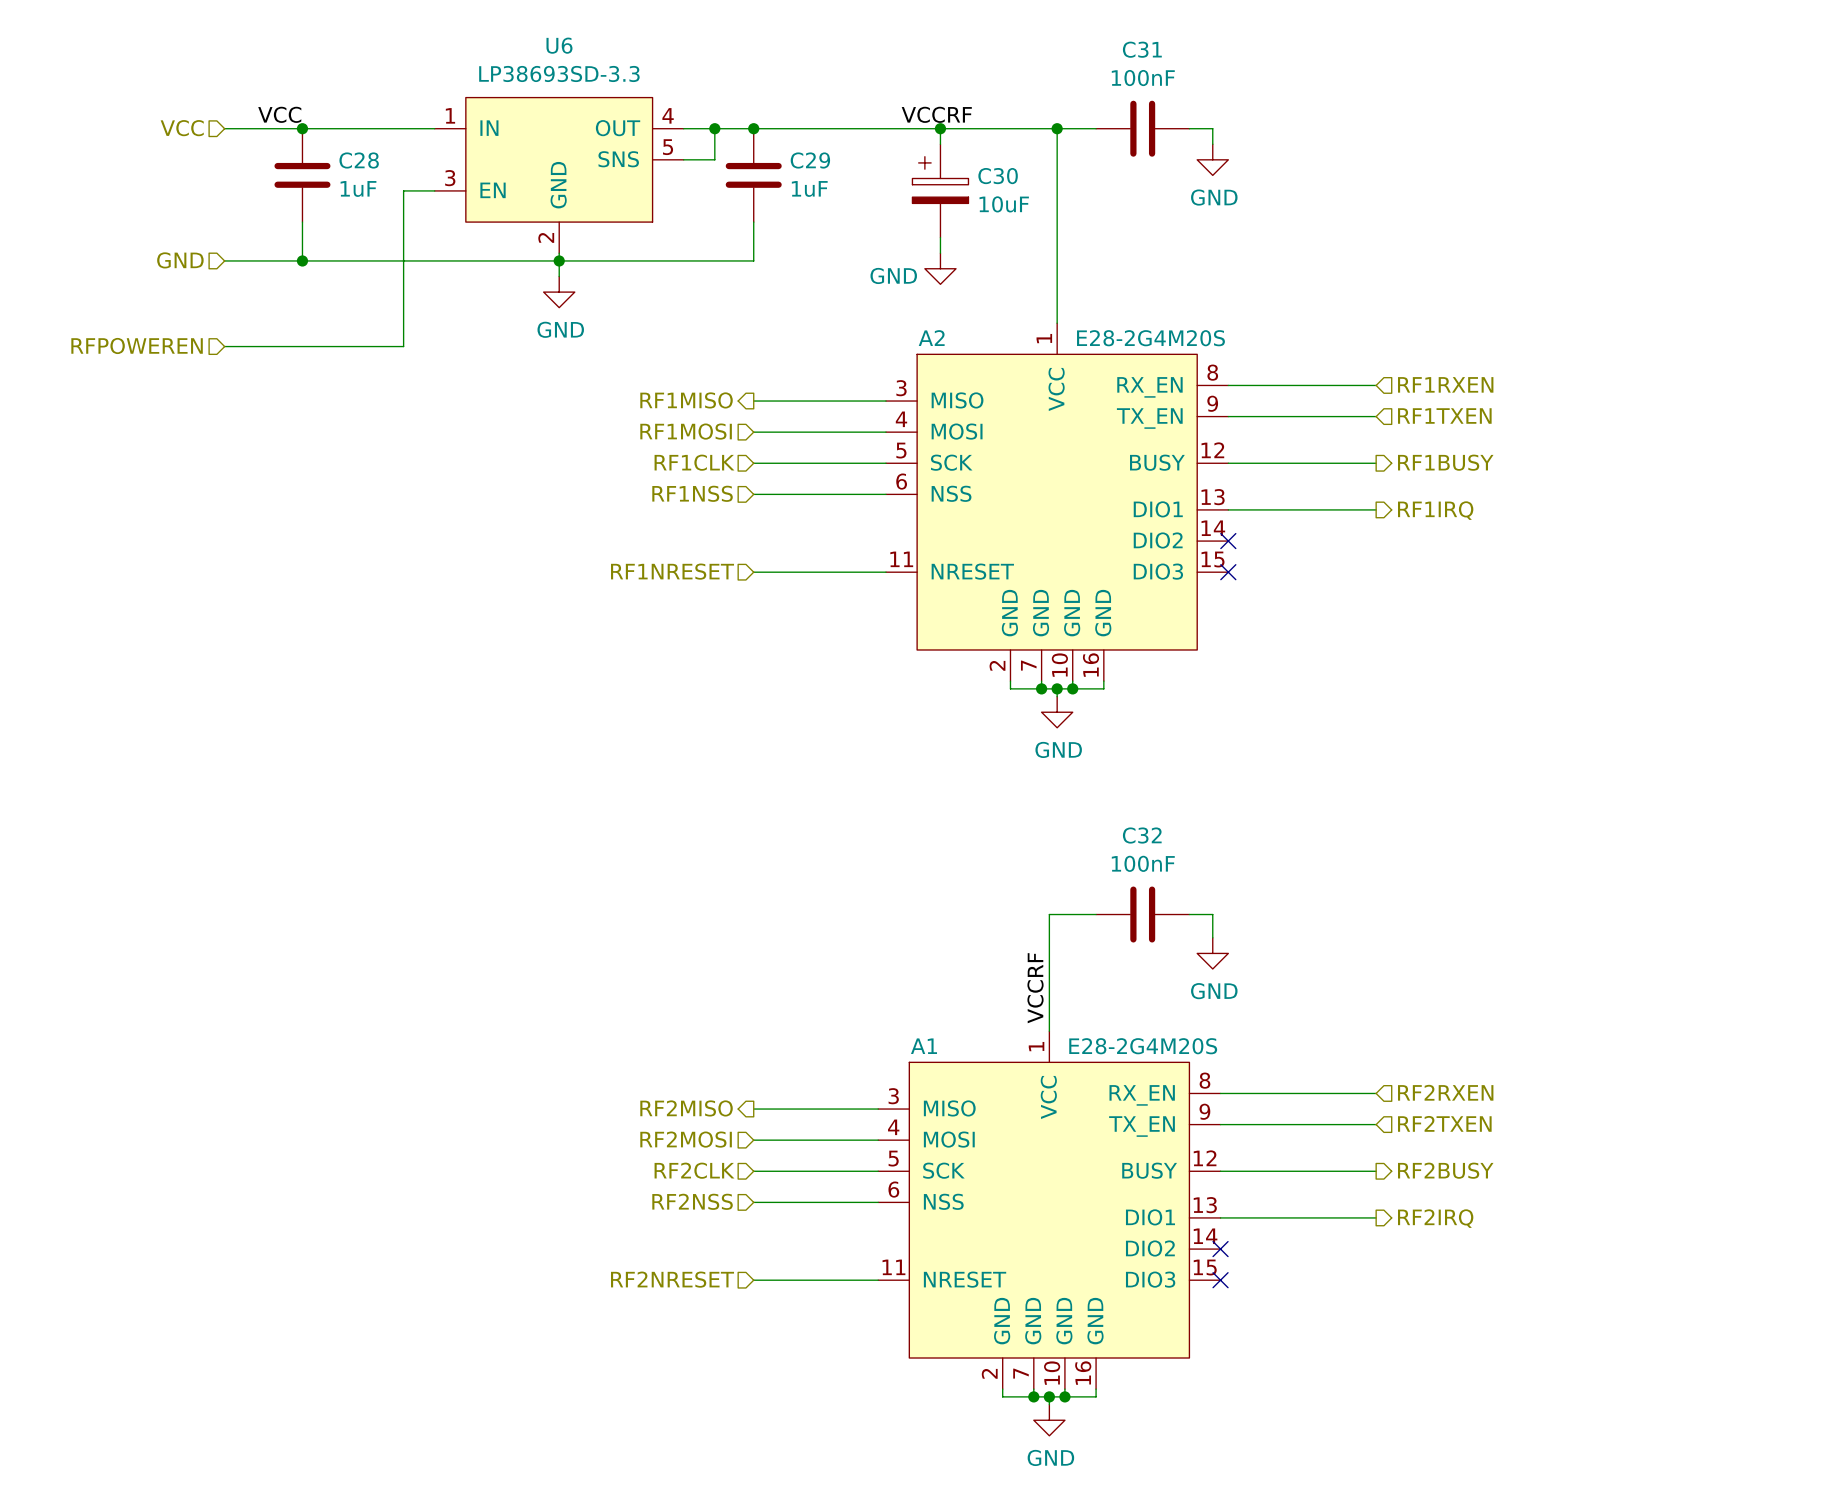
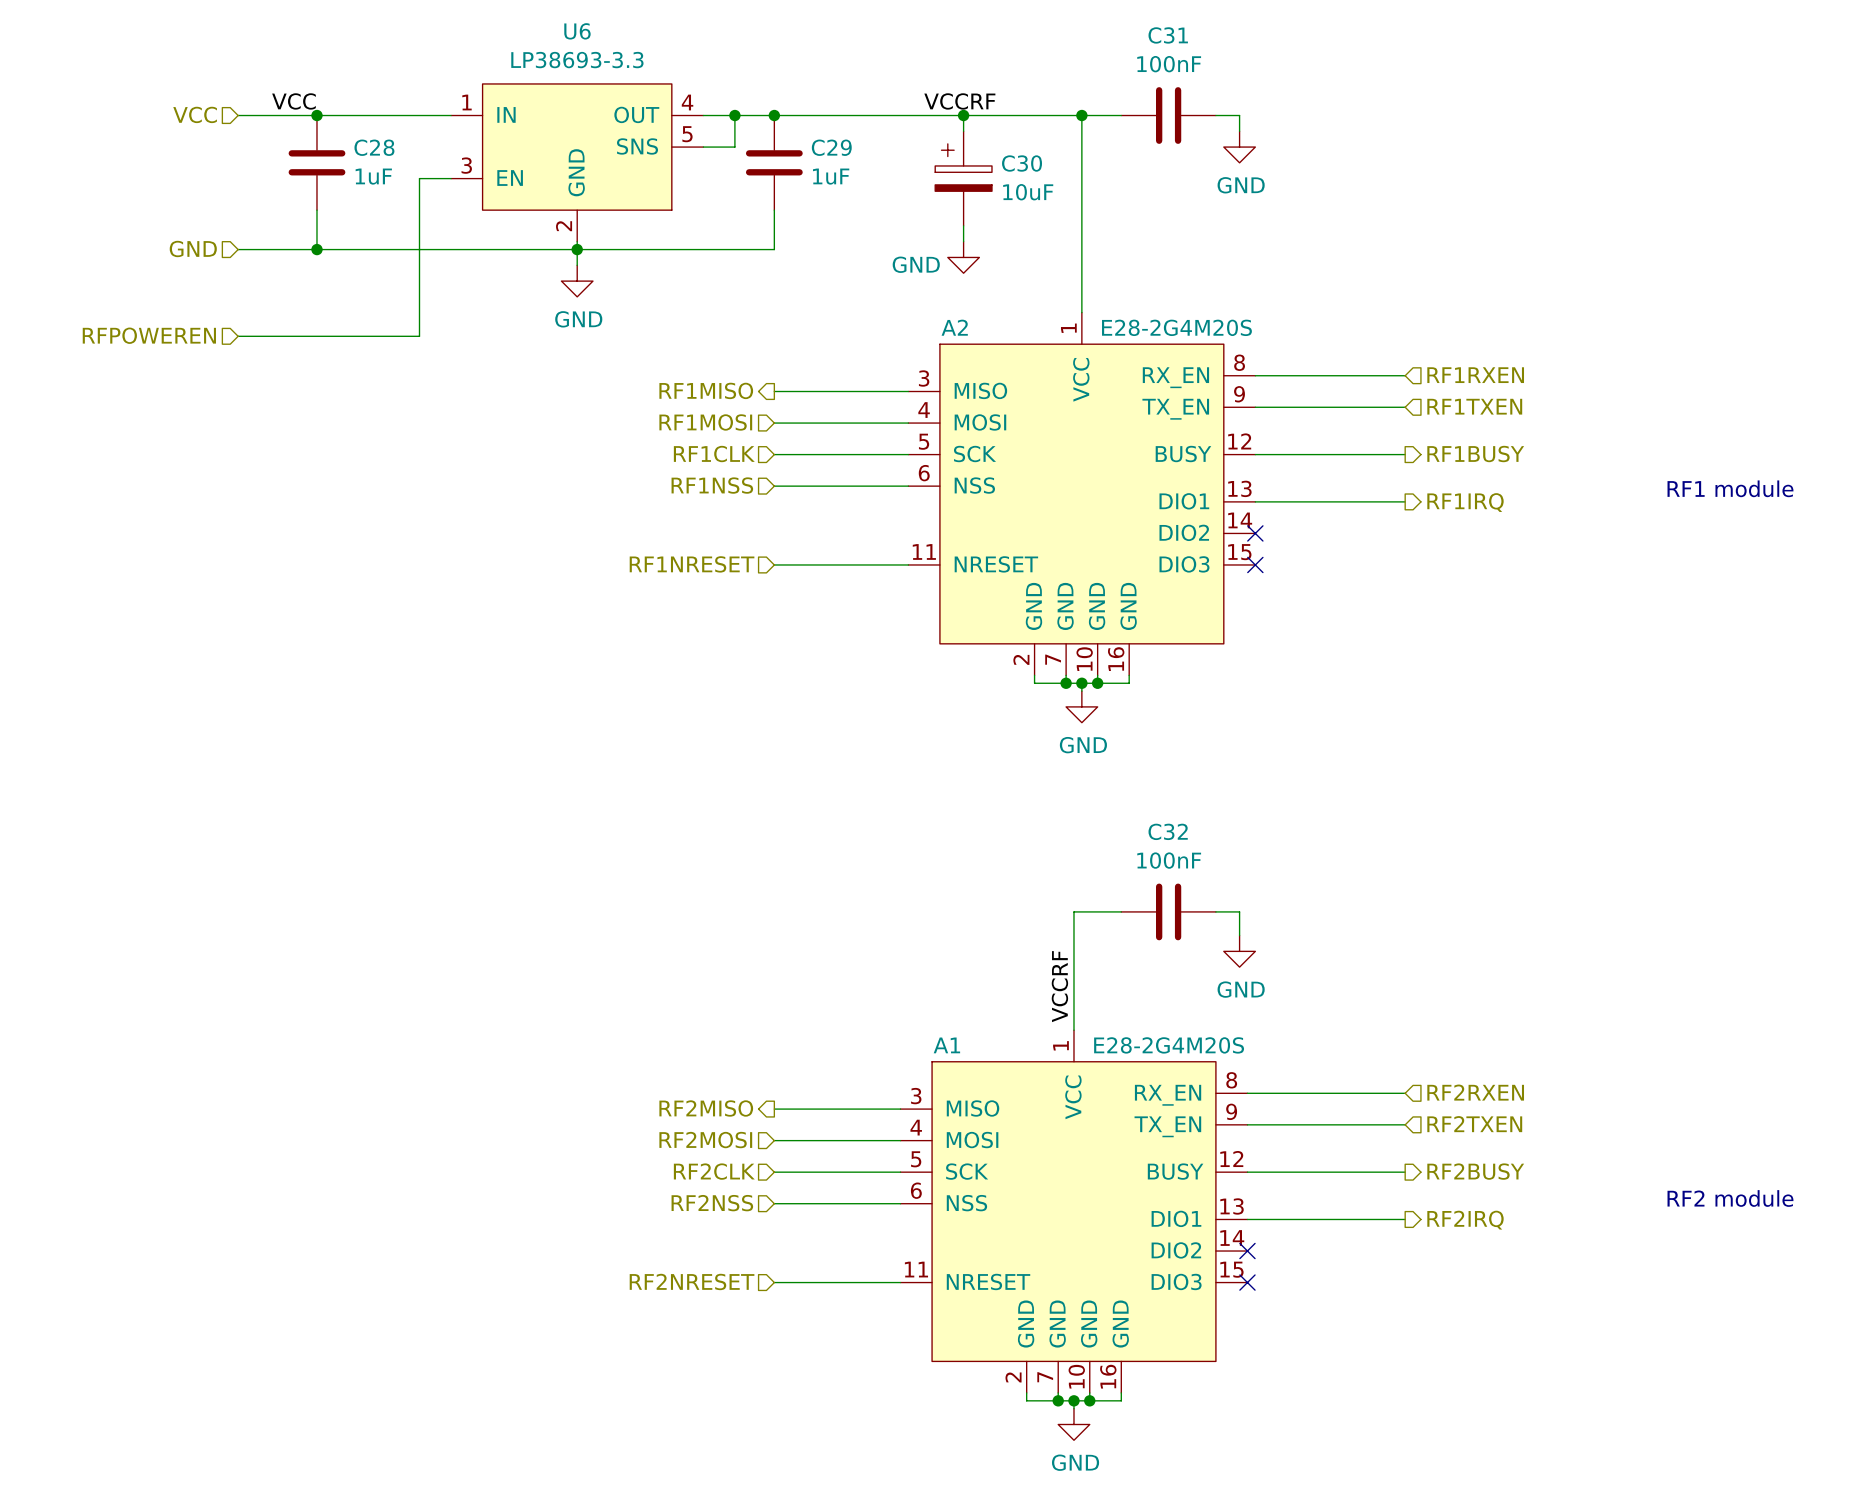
U6 value: LP38693SD-3.3 (559, 73) -> LP38693-3.3 (577, 60)
text: none -> RF1 module (1730, 488)
text: none -> RF2 module (1730, 1198)

